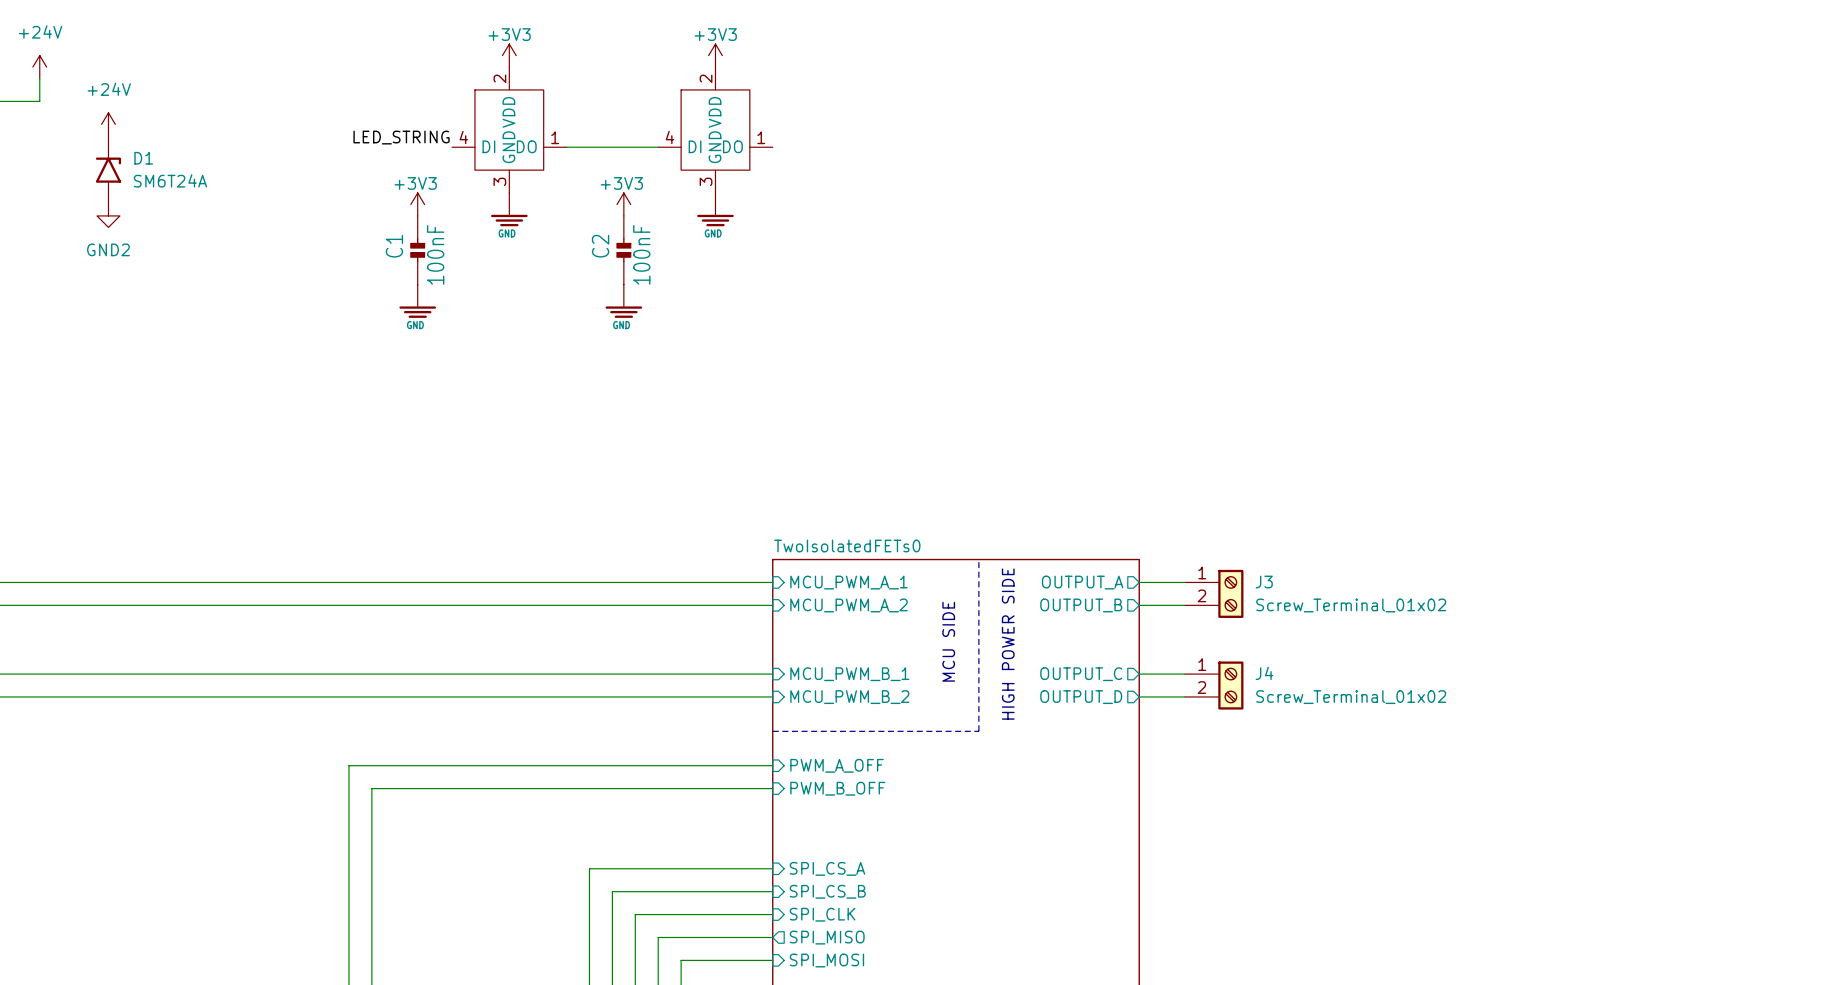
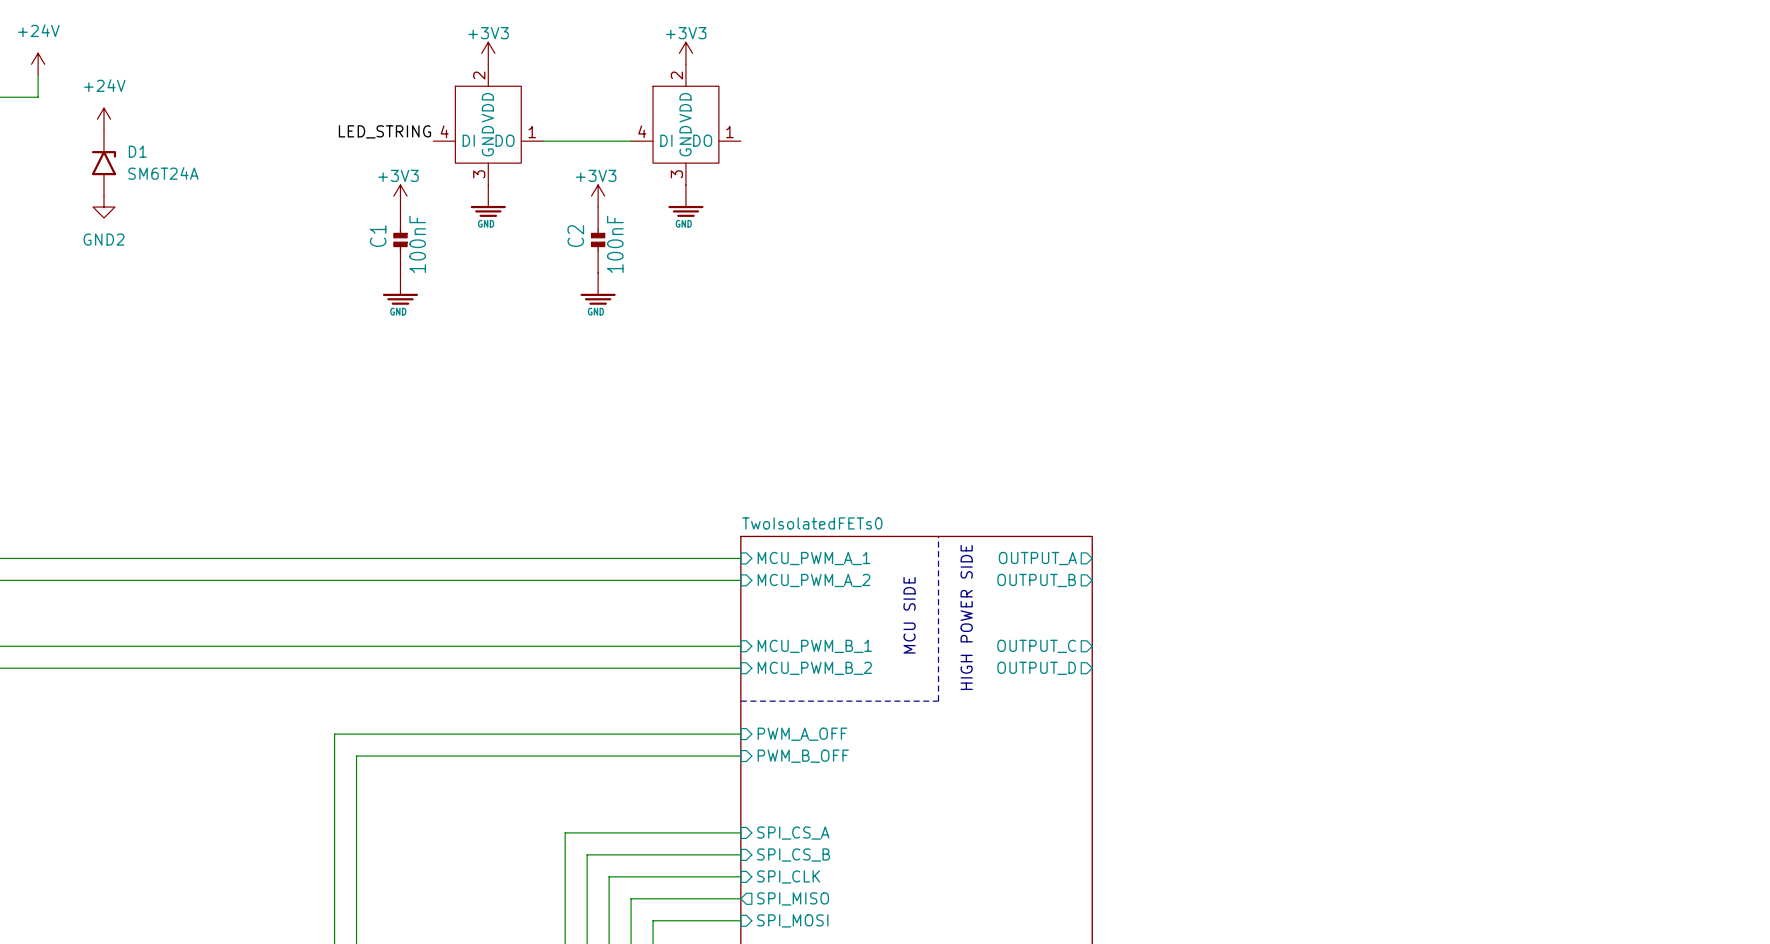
wire: (1139, 582) (1185, 582) -> none
J3: Screw_Terminal_01x02 (1214, 593) -> none
wire: (1139, 605) (1185, 605) -> none
wire: (1139, 674) (1185, 674) -> none
J4: Screw_Terminal_01x02 (1214, 685) -> none
wire: (1139, 696) (1185, 696) -> none

